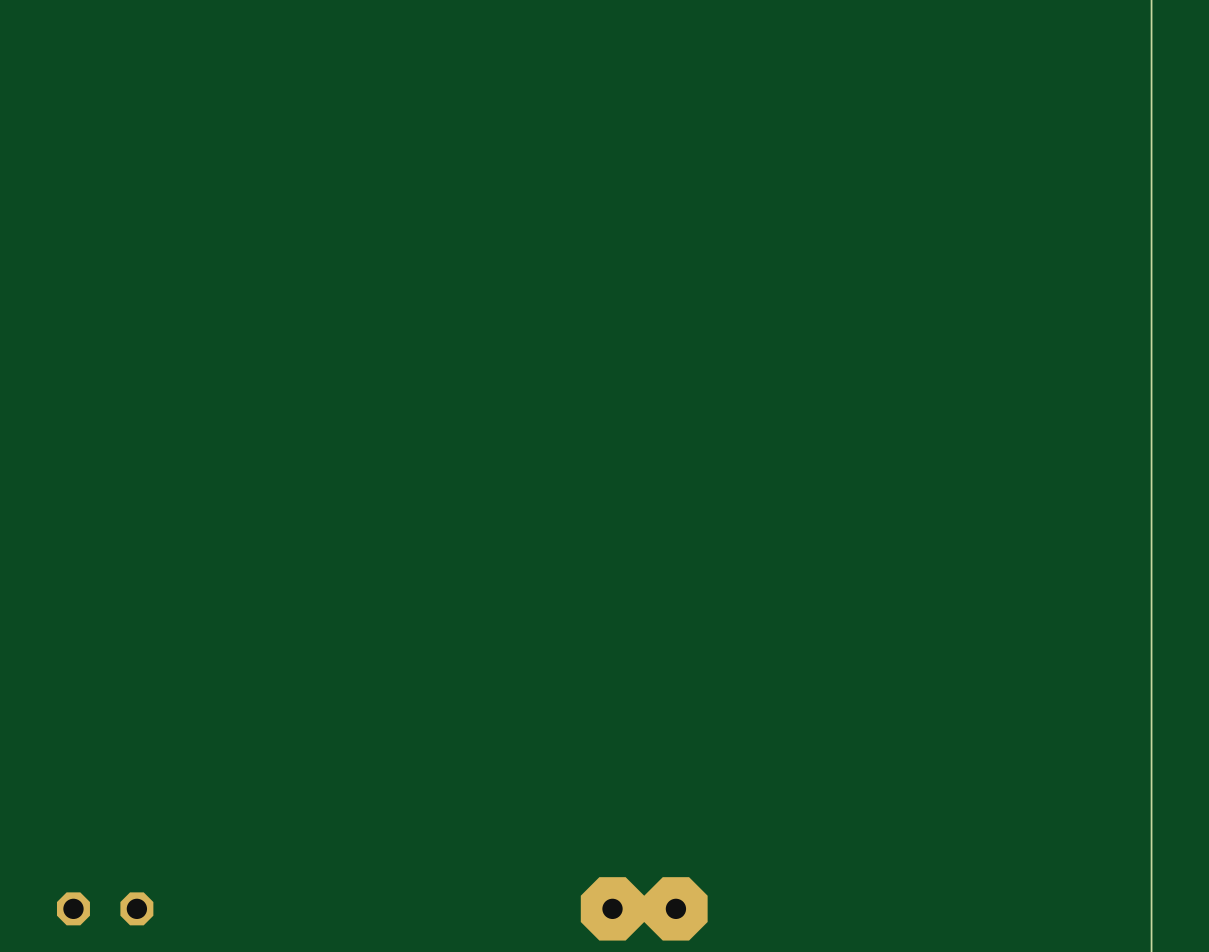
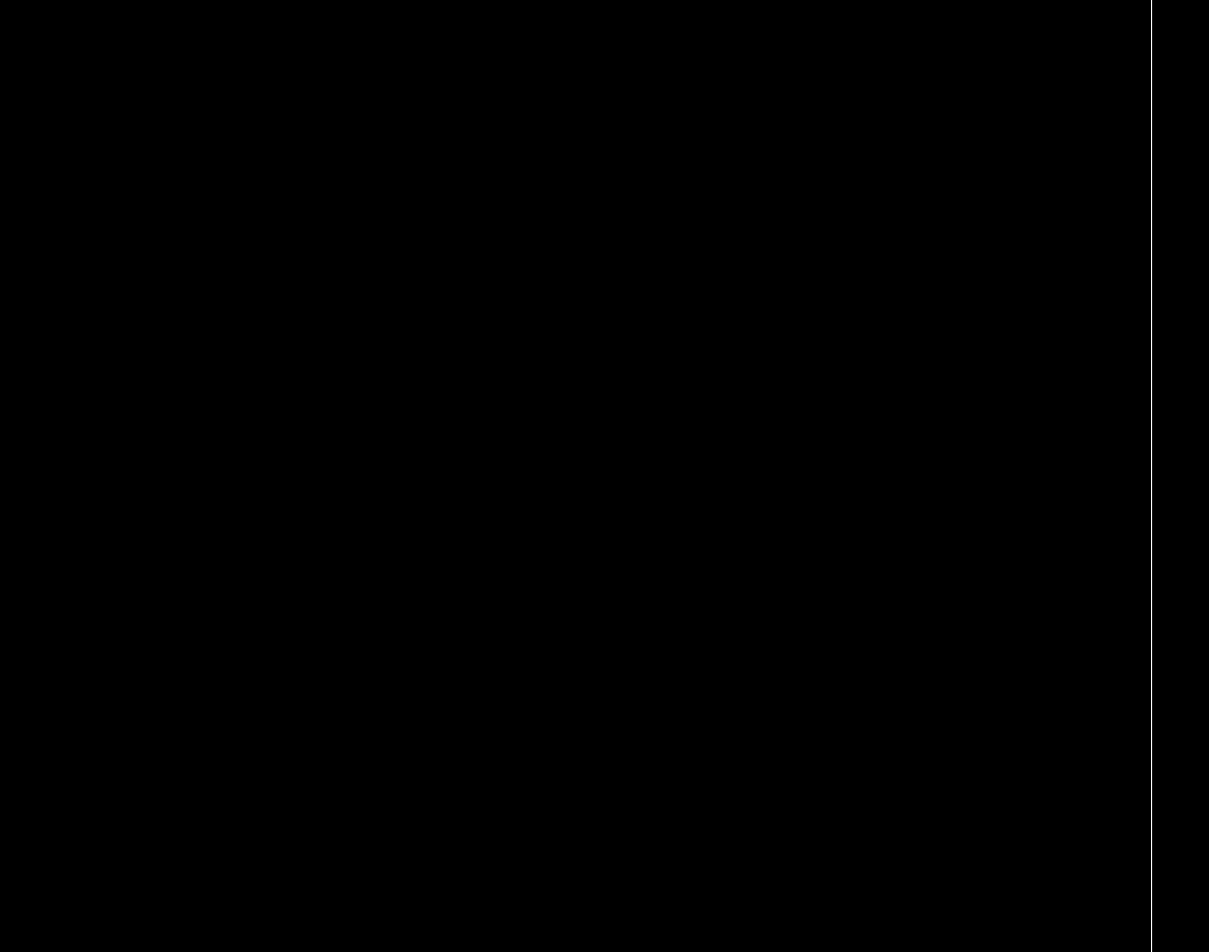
part: (105, 908) -> none
part: (612, 908) -> none
part: (675, 908) -> none

